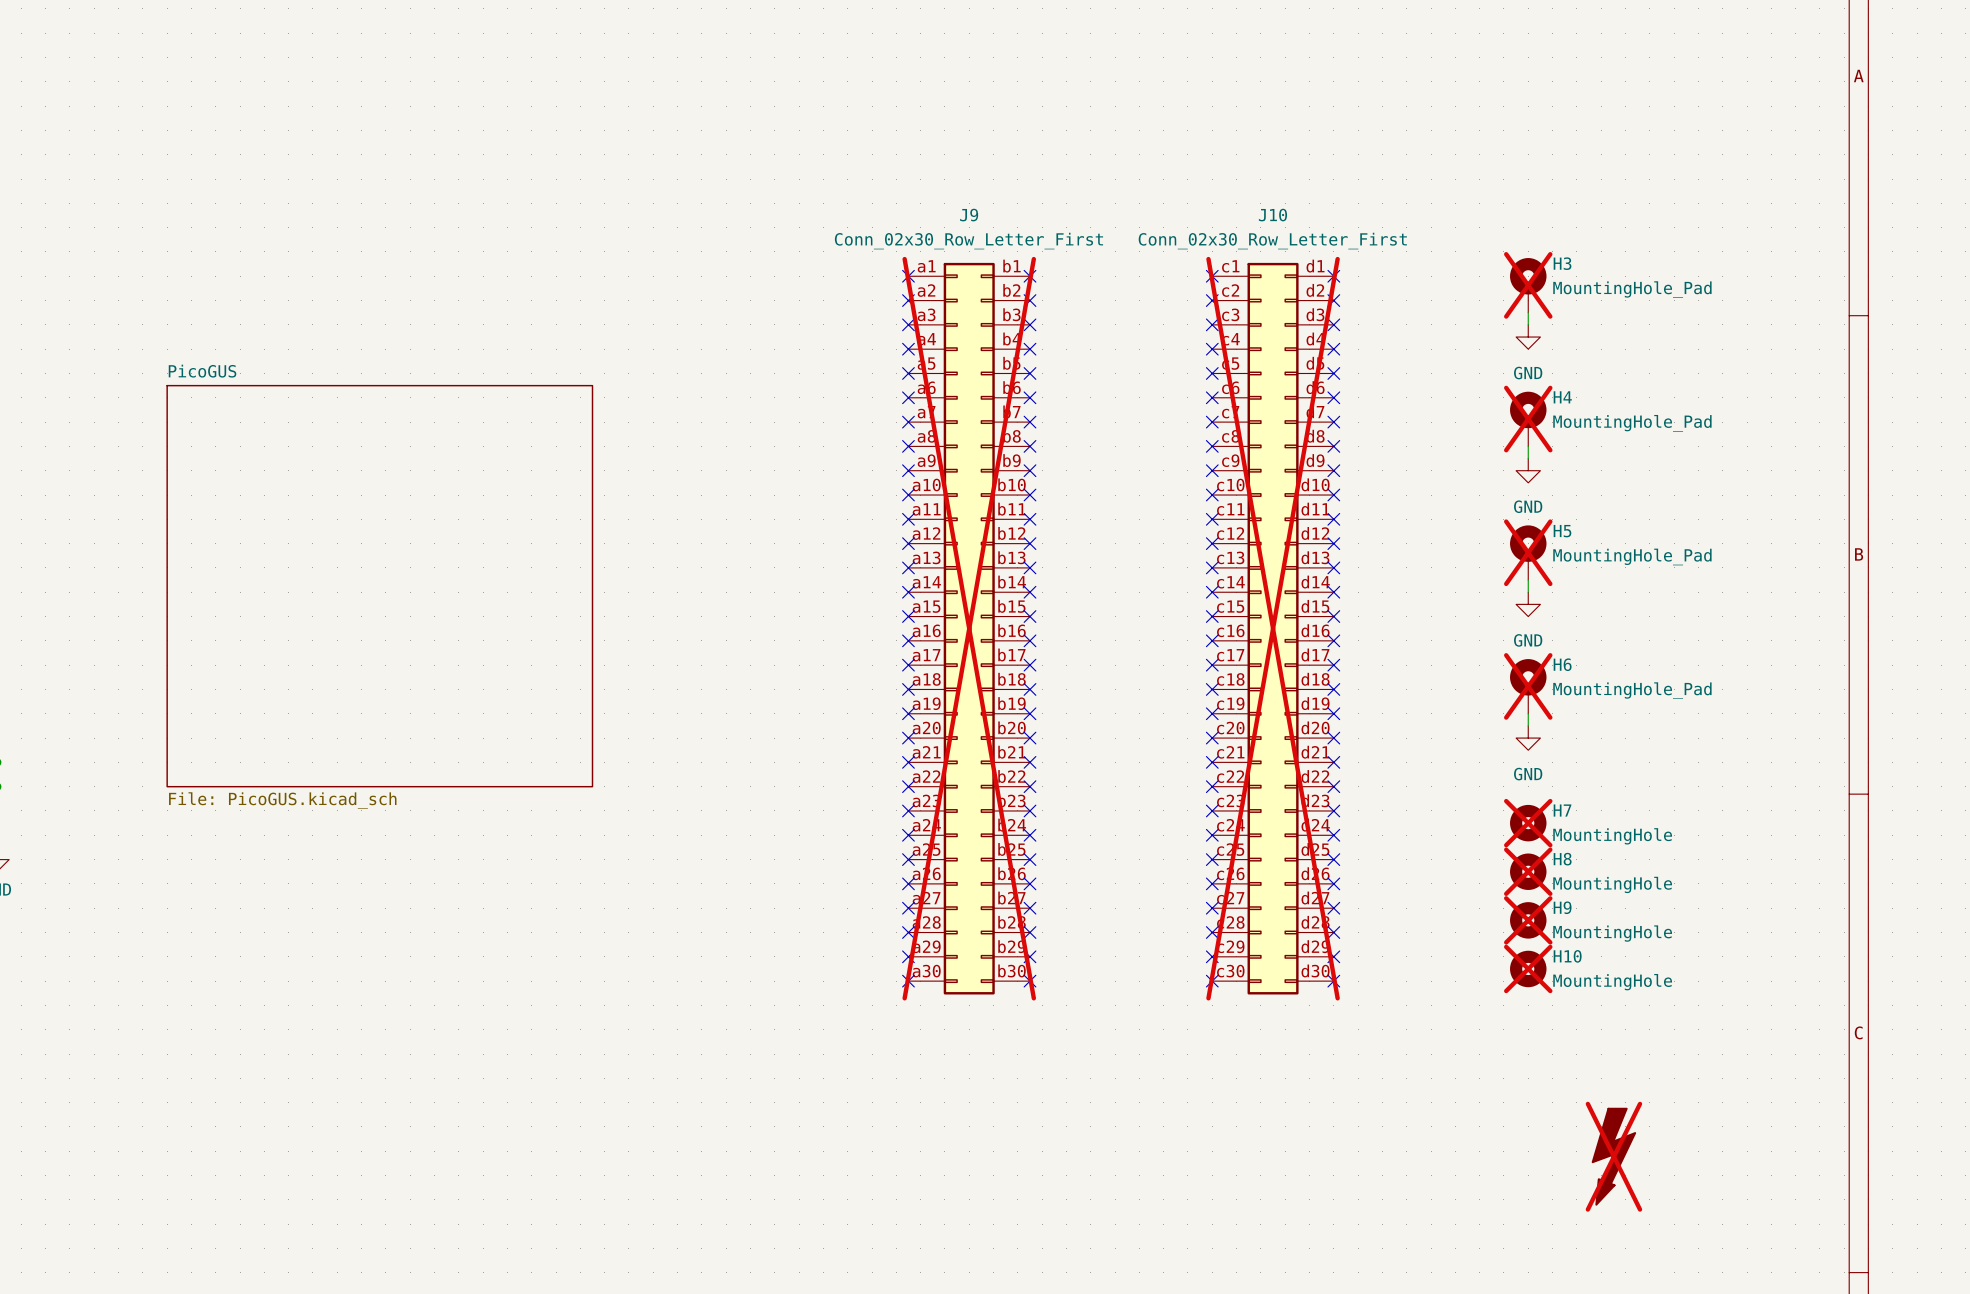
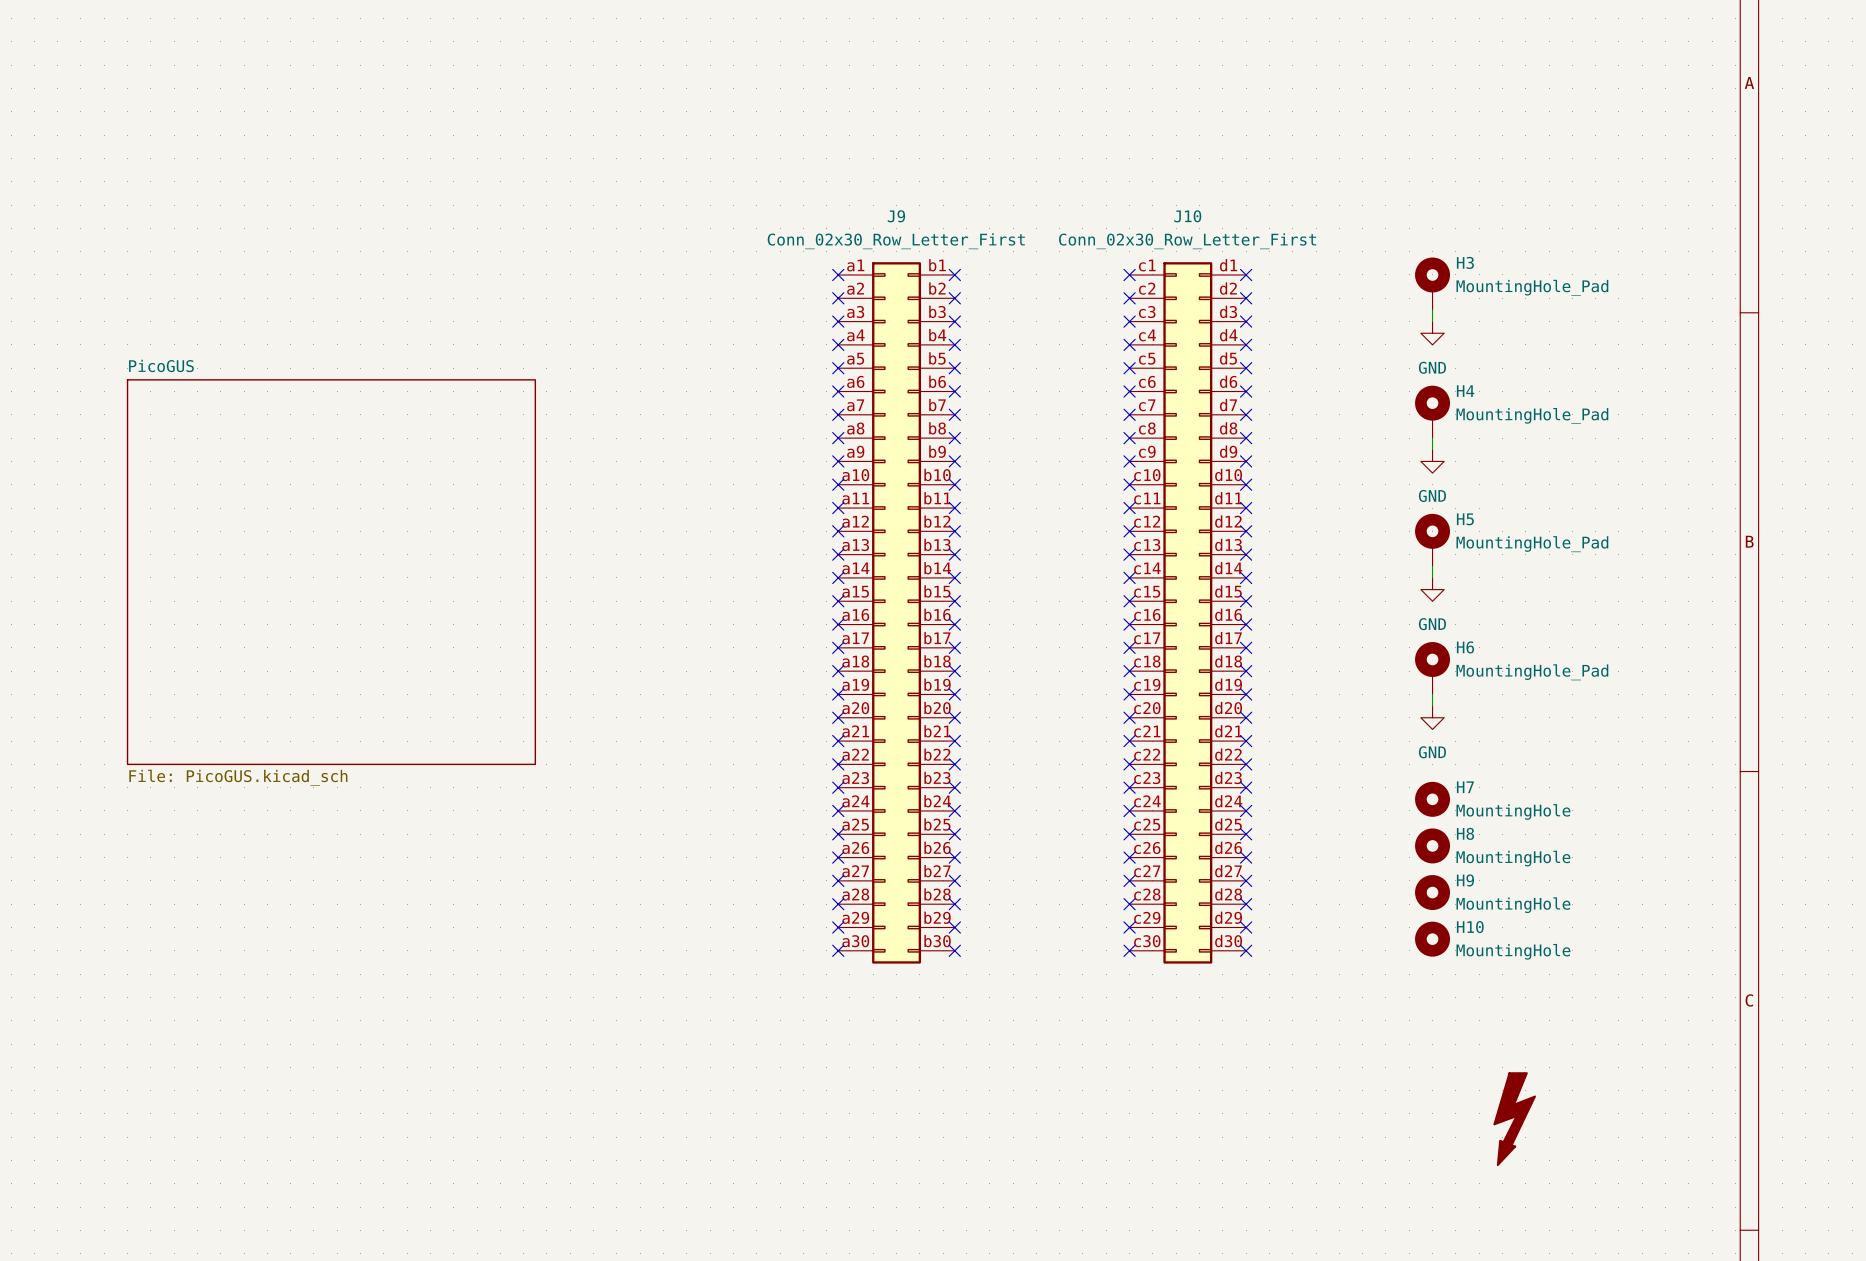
H3 do-not-place cross: (1528, 285) -> none
H4 do-not-place cross: (1528, 419) -> none
H5 do-not-place cross: (1528, 552) -> none
J9 do-not-place cross: (969, 628) -> none
J10 do-not-place cross: (1273, 628) -> none
H6 do-not-place cross: (1528, 686) -> none
H7 do-not-place cross: (1528, 823) -> none
H8 do-not-place cross: (1528, 871) -> none
H9 do-not-place cross: (1528, 920) -> none
H10 do-not-place cross: (1528, 968) -> none
part do-not-place cross: (1613, 1156) -> none

